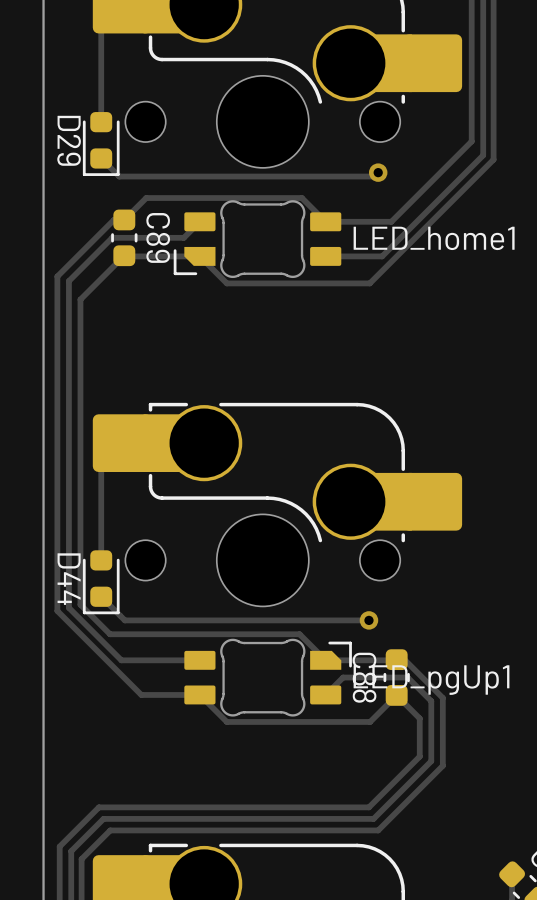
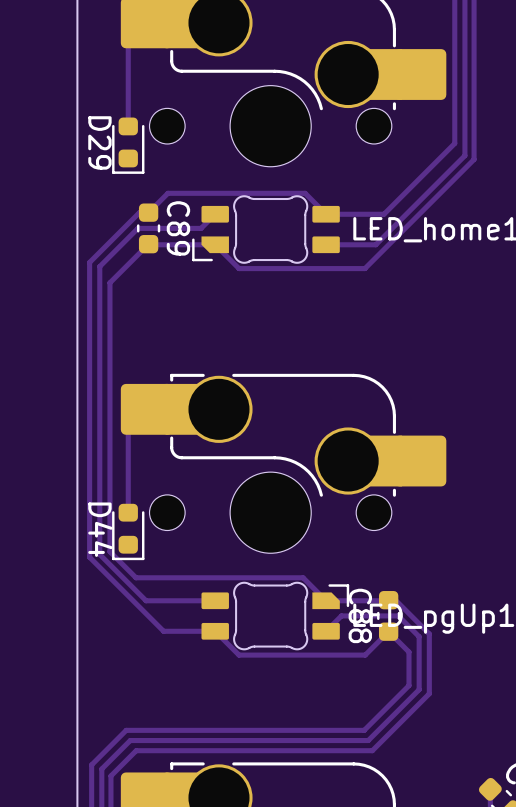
track: (101, 158) (119, 176) (374, 176) (378, 172) -> none
via: (378, 172) -> none
track: (101, 596) (124, 620) (368, 620) -> none
via: (368, 620) -> none

